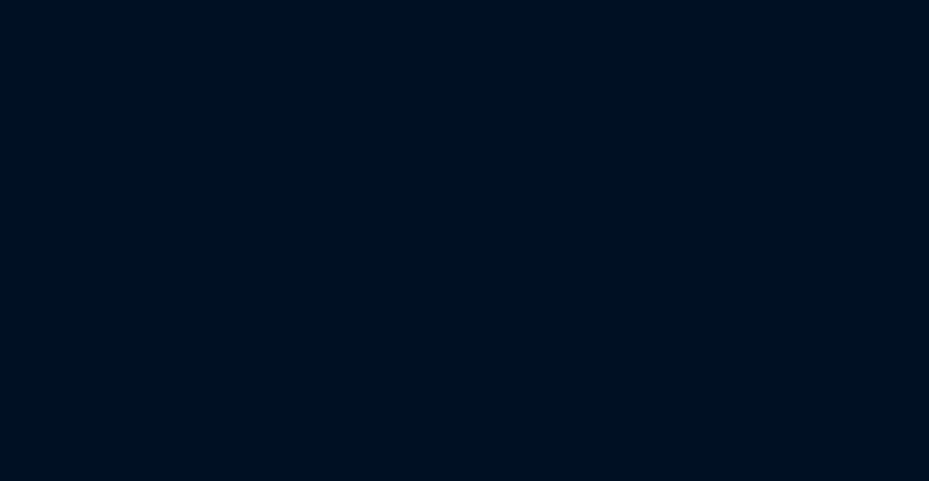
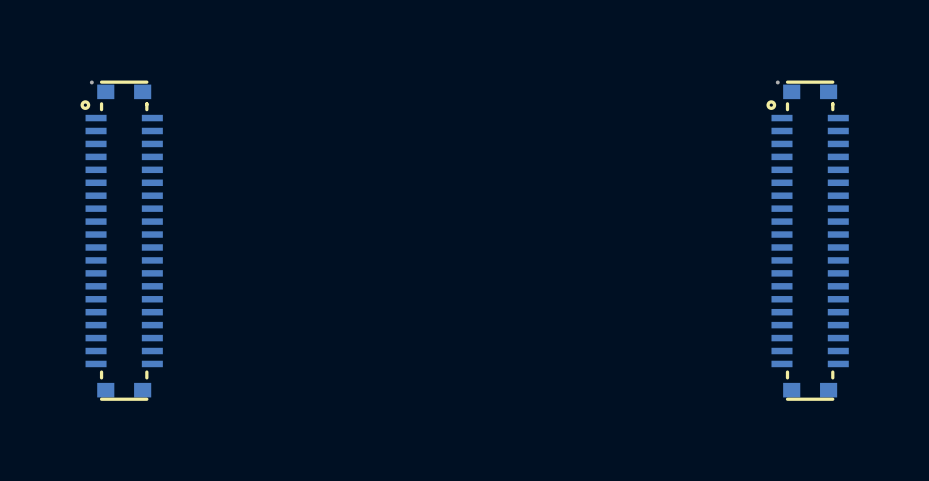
part: none -> (121, 240)
part: none -> (807, 240)

